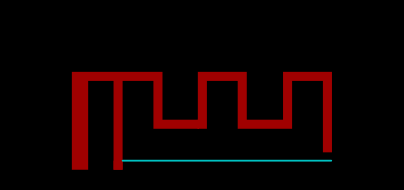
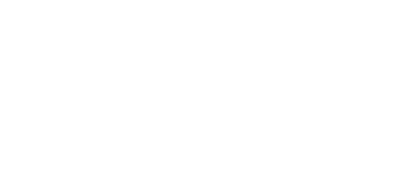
part: (202, 120) -> none

